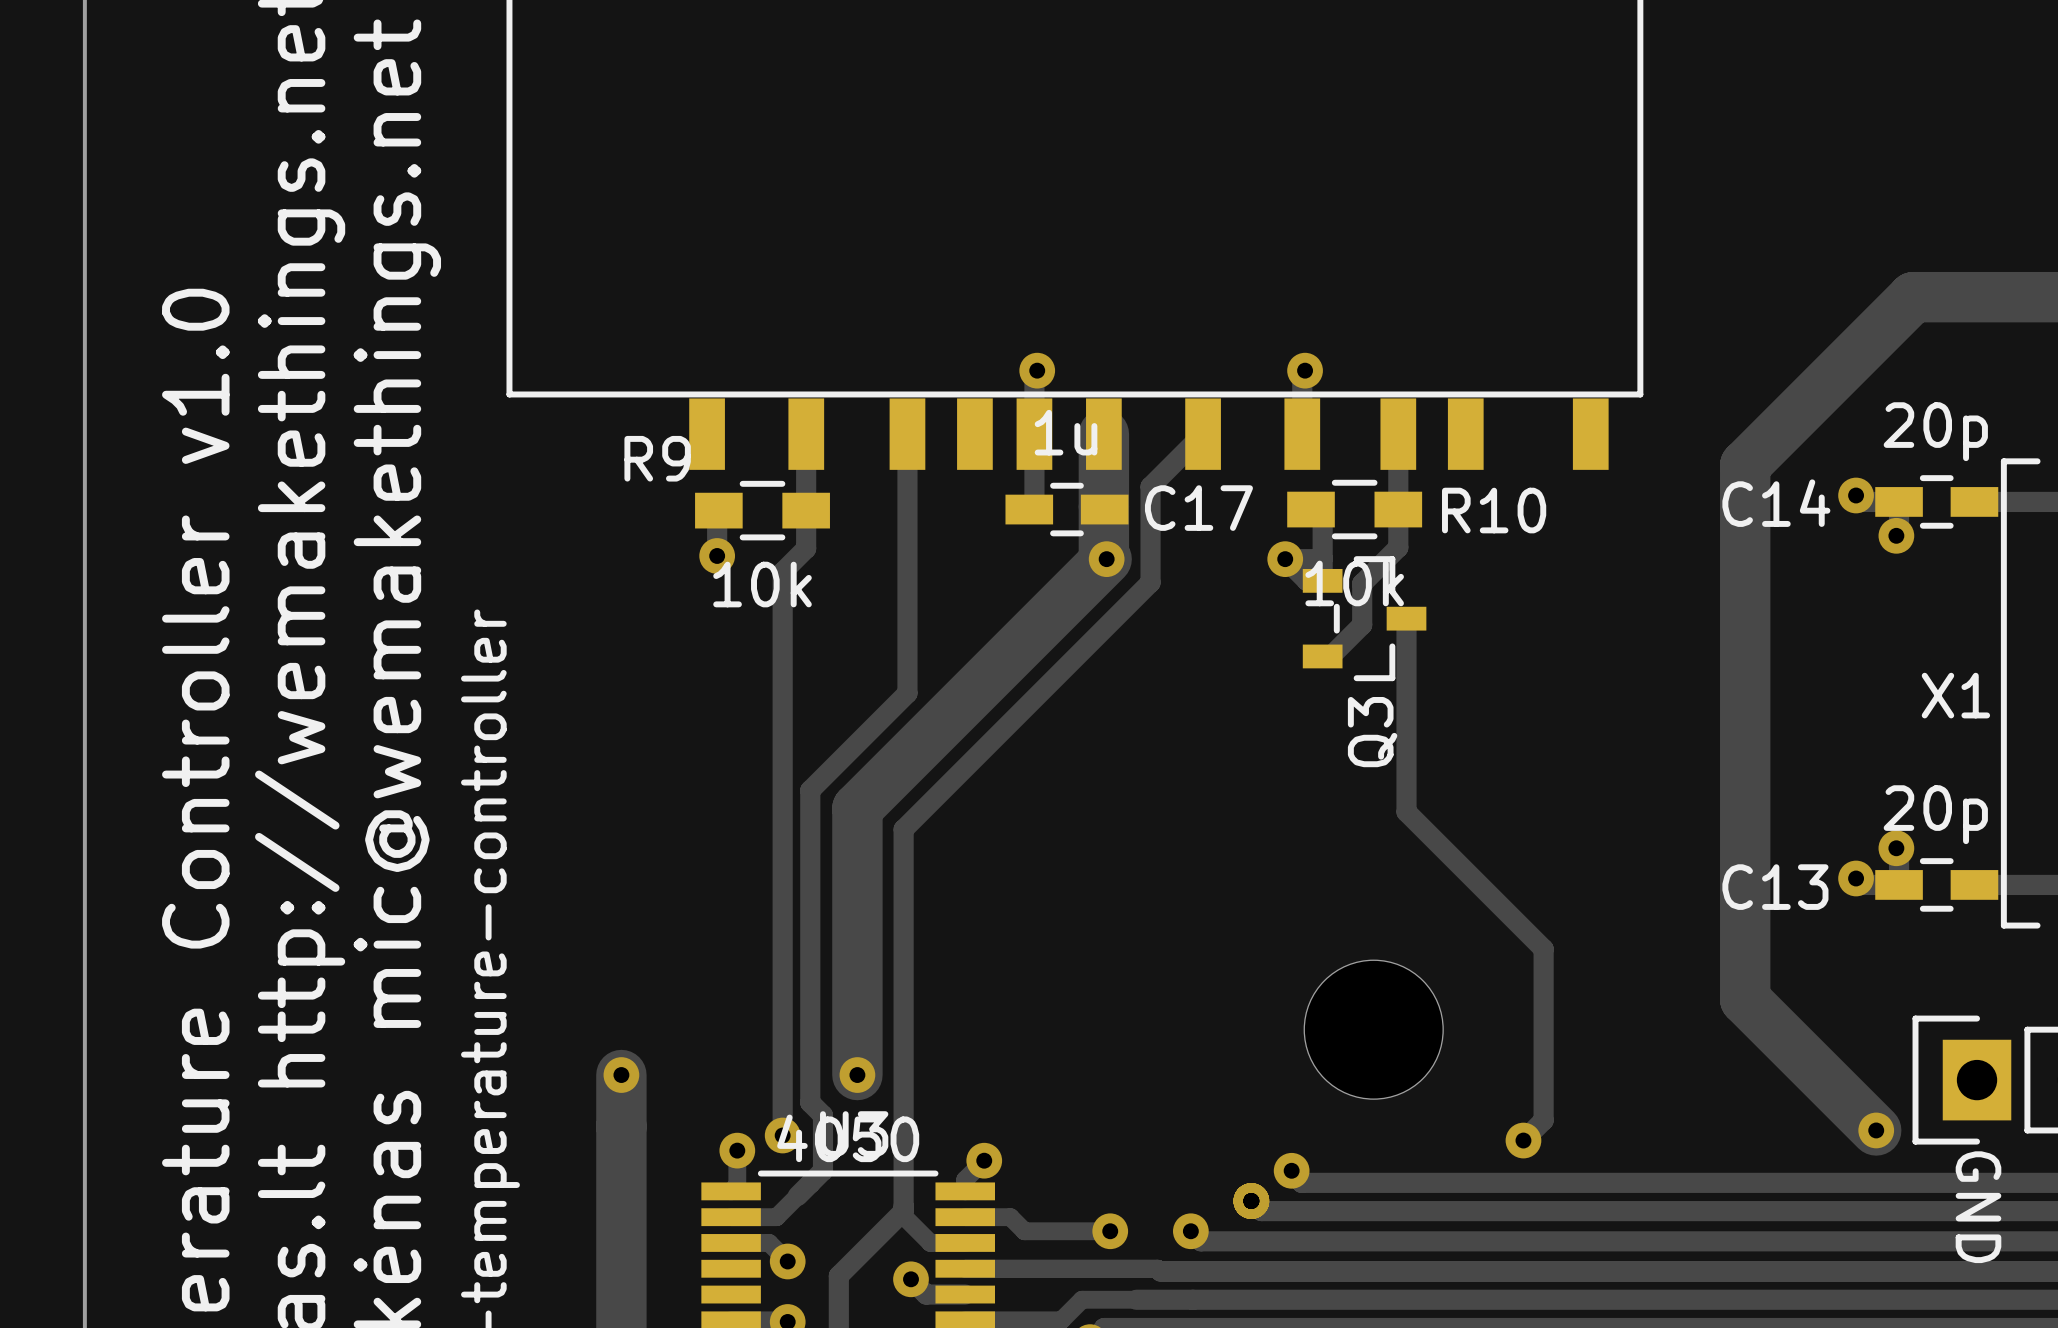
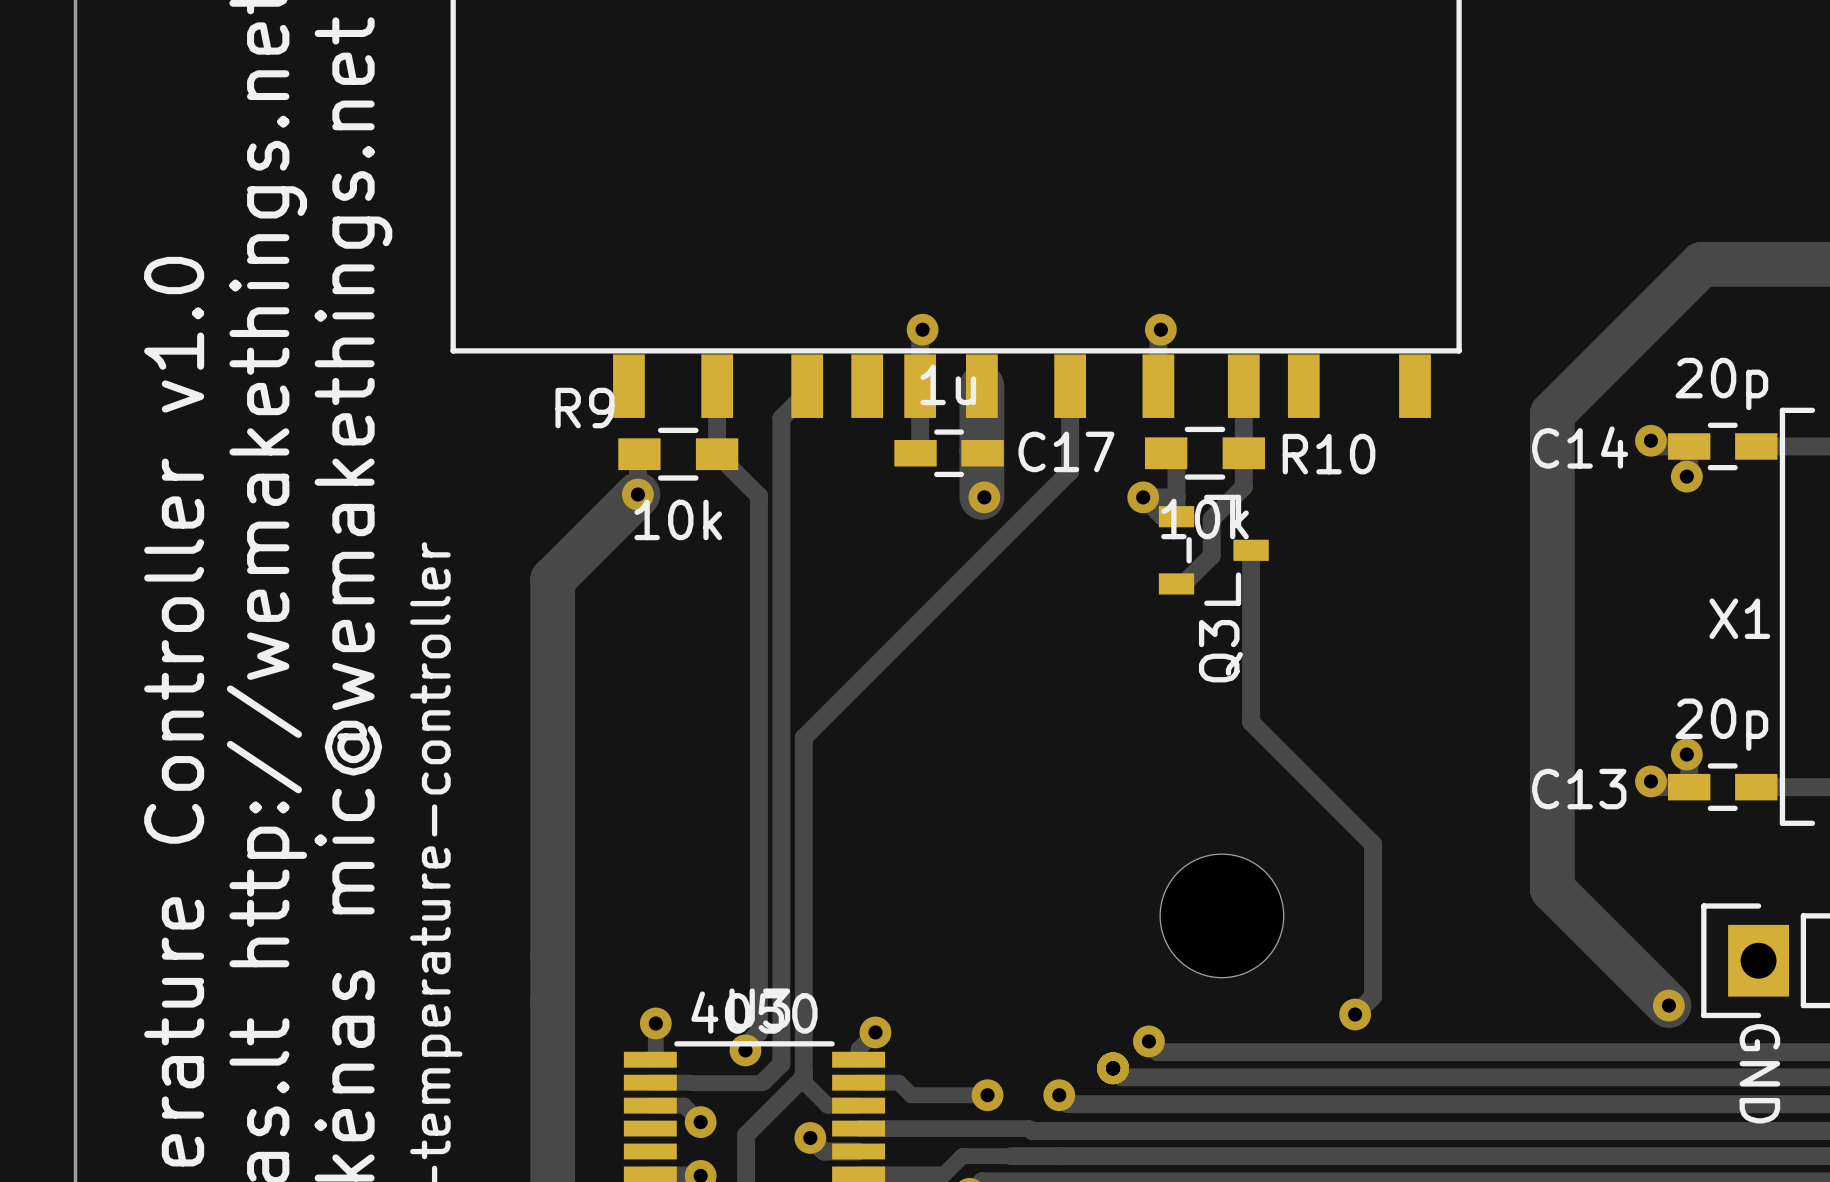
track: (1203, 434) (1150, 486) (1150, 582) -> (1070, 386) (1070, 471) (1023, 518)
track: (907, 441) (907, 693) (810, 790) (810, 1102) (822, 1115) (822, 1170) (776, 1217) -> (807, 392) (781, 418) (781, 1063) (762, 1083) (693, 1083)
track: (806, 510) (806, 548) (782, 572) (782, 1135) -> (717, 454) (758, 496) (758, 1032) (745, 1045) (745, 1050)
track: none -> (637, 494) (552, 579) (552, 956)
track: (1106, 559) (857, 808) (857, 1075) -> none
via: (621, 1075) -> none
via: (857, 1075) -> none
via: (782, 1135) -> none
via: none -> (745, 1050)

